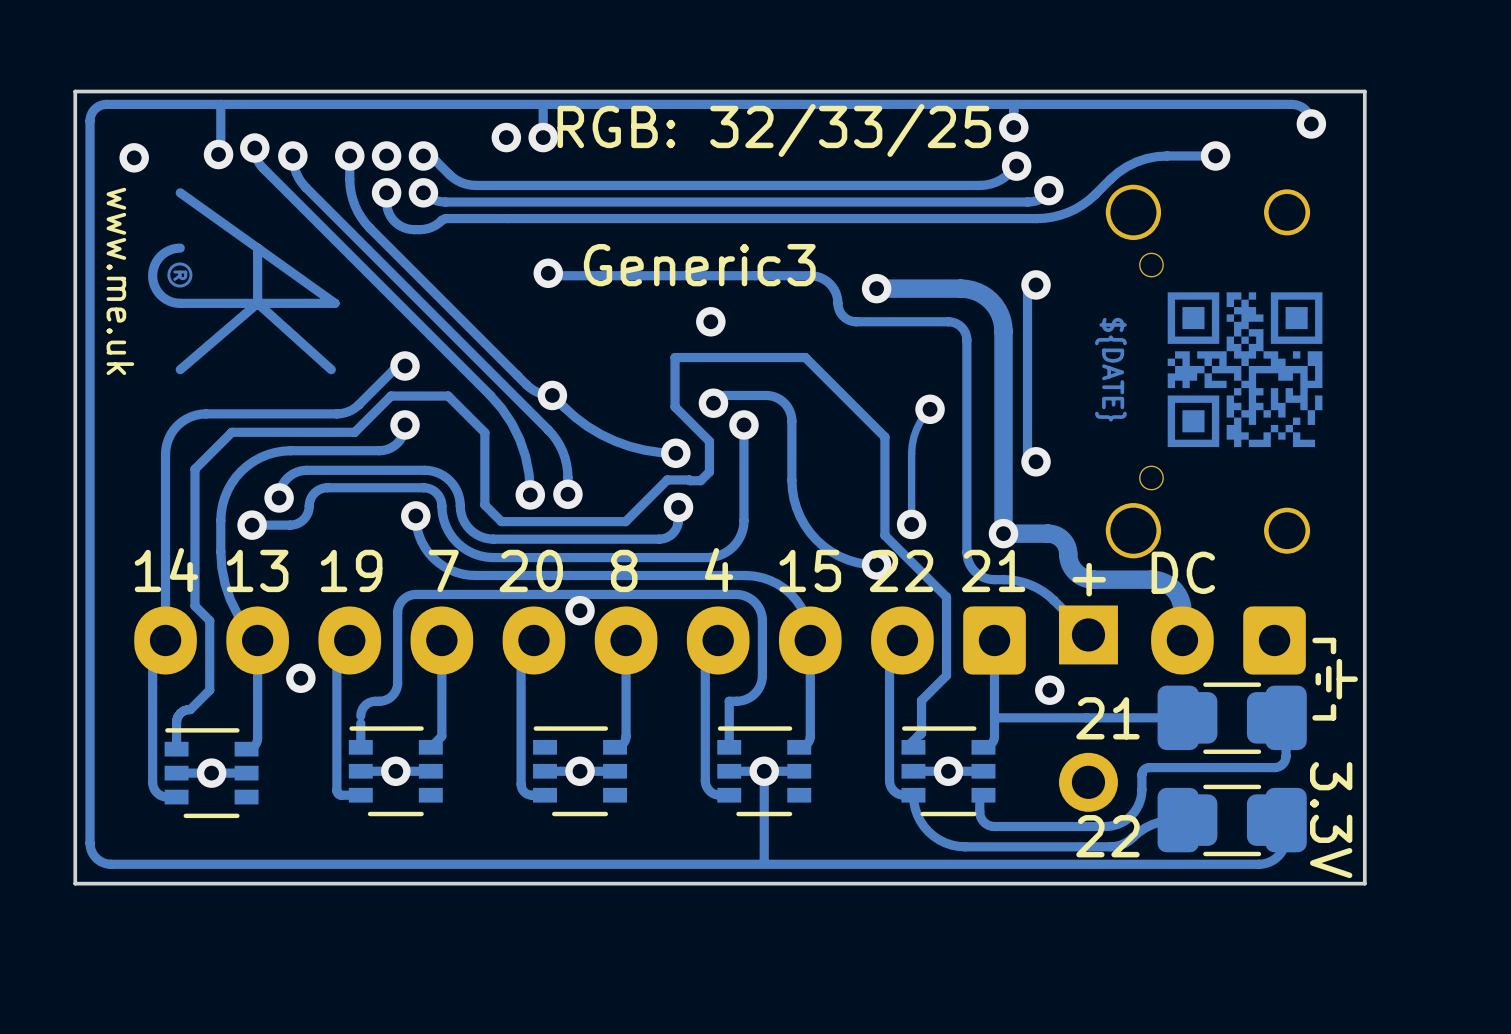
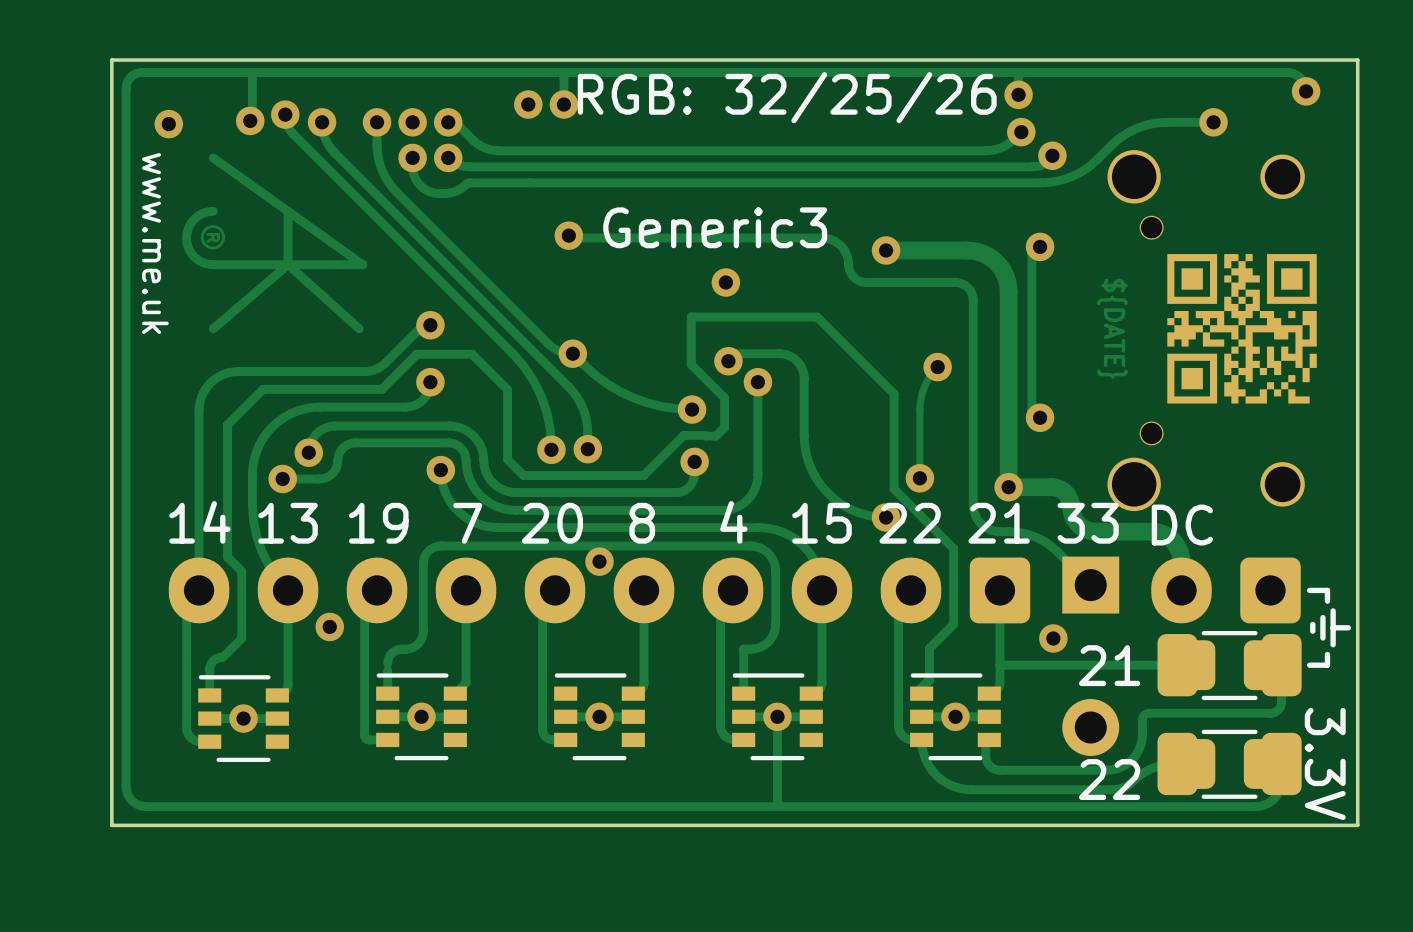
text: RGB: 32/33/25 (774, 130) -> RGB: 32/25/26 (787, 97)
part text: none -> 33 (1088, 523)
part text: + (1089, 579) -> none

